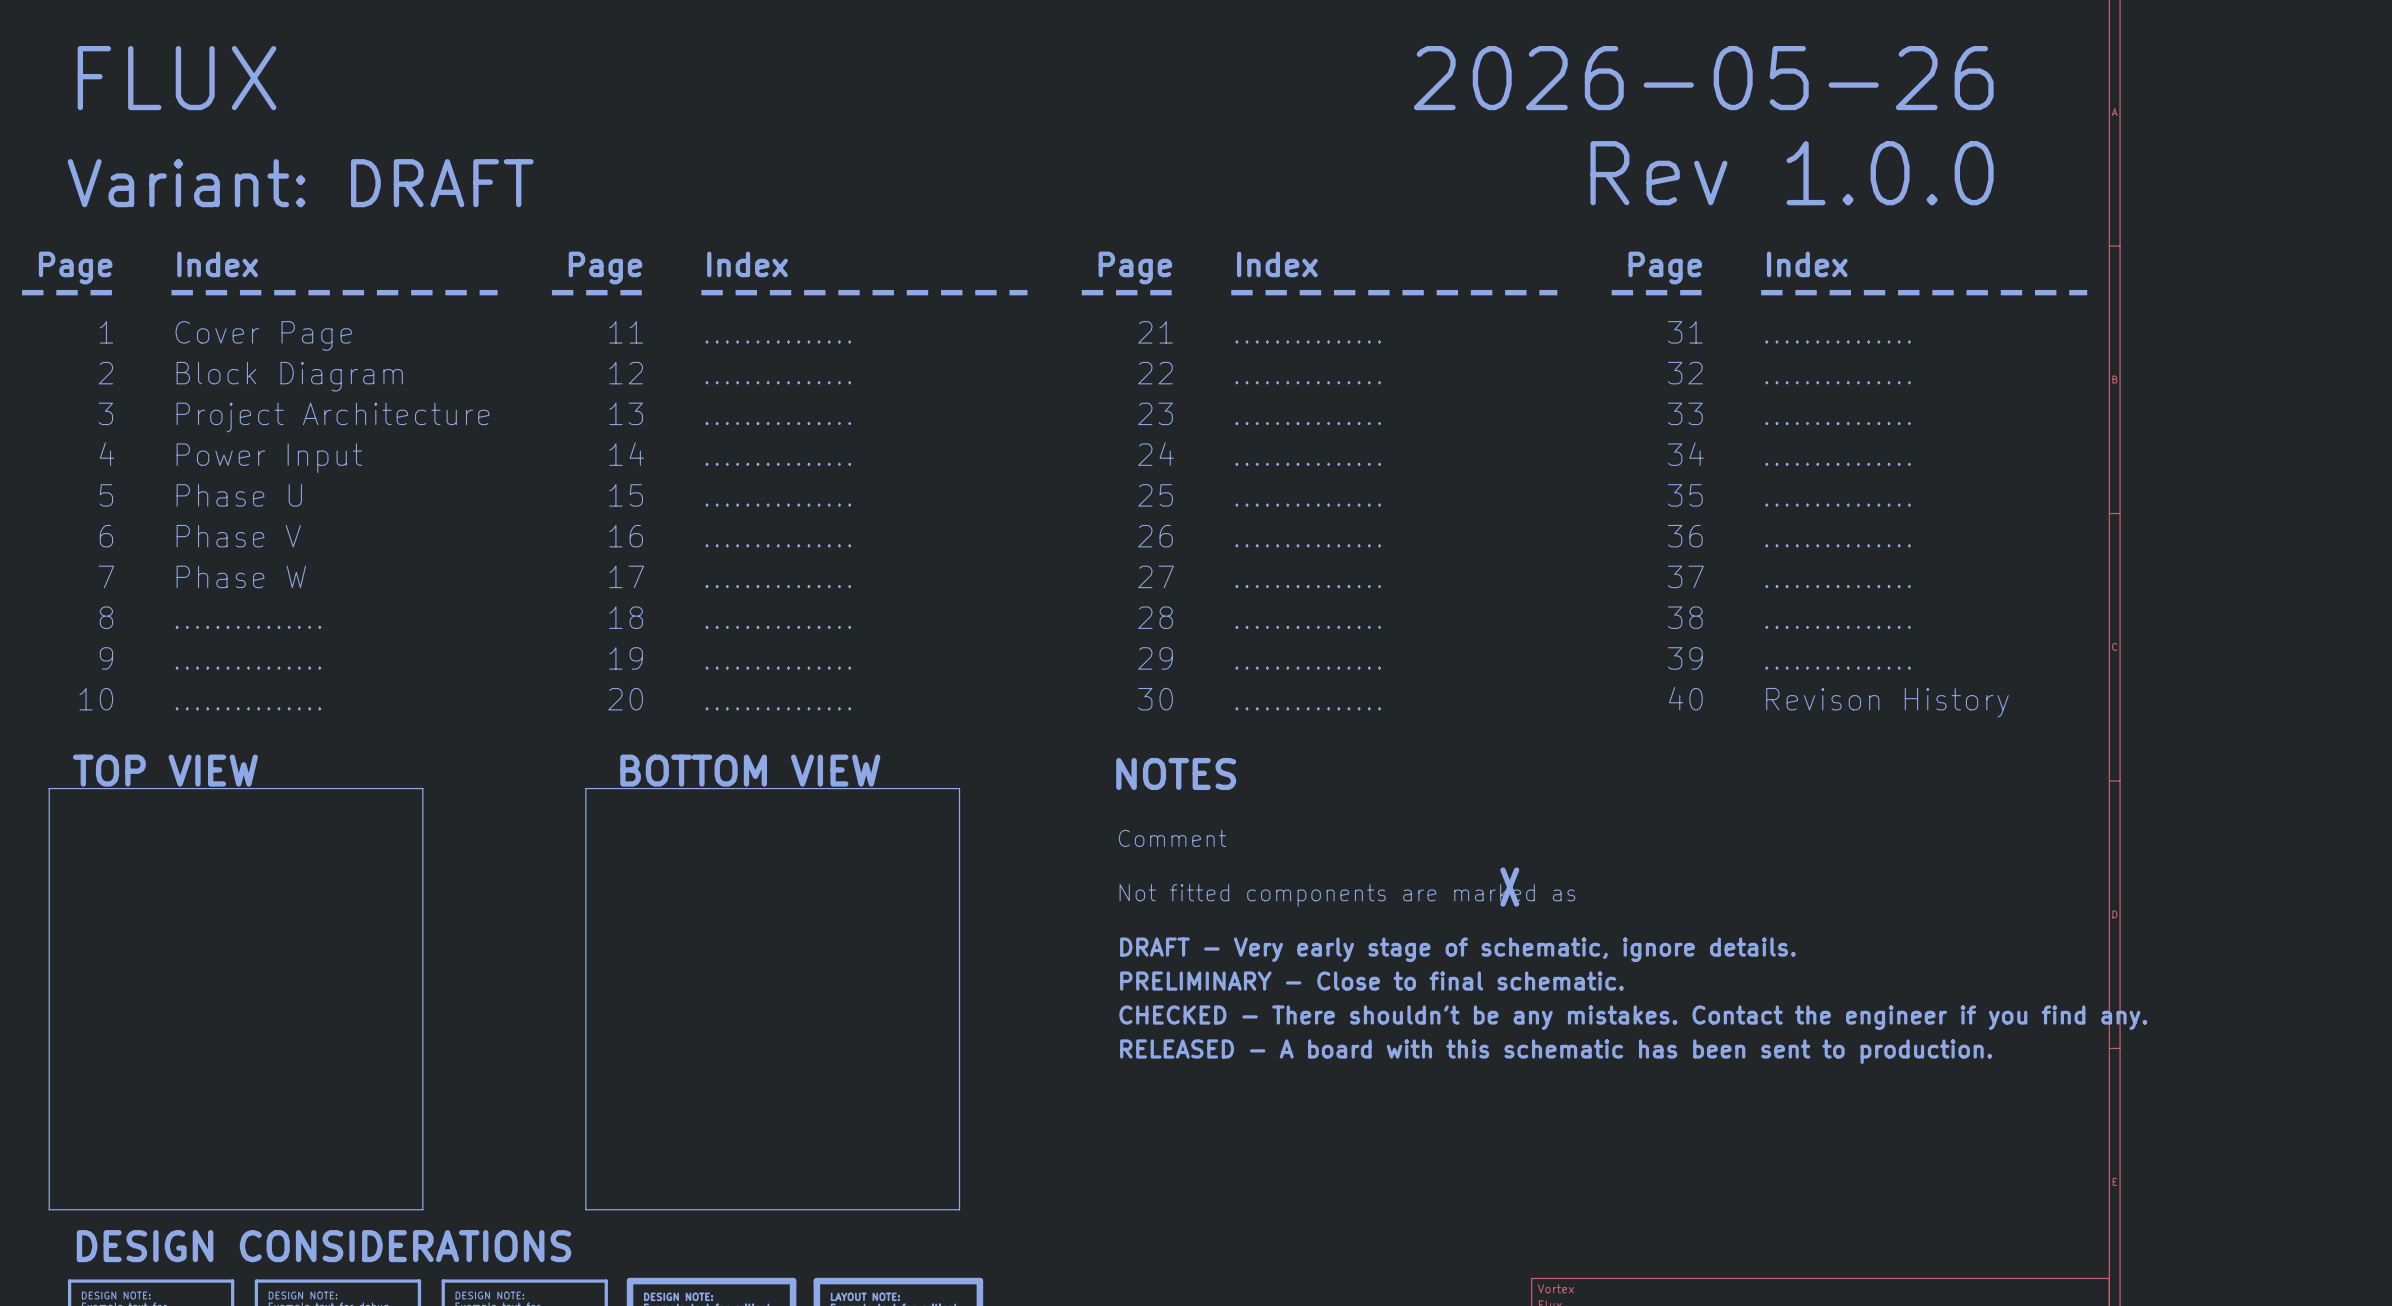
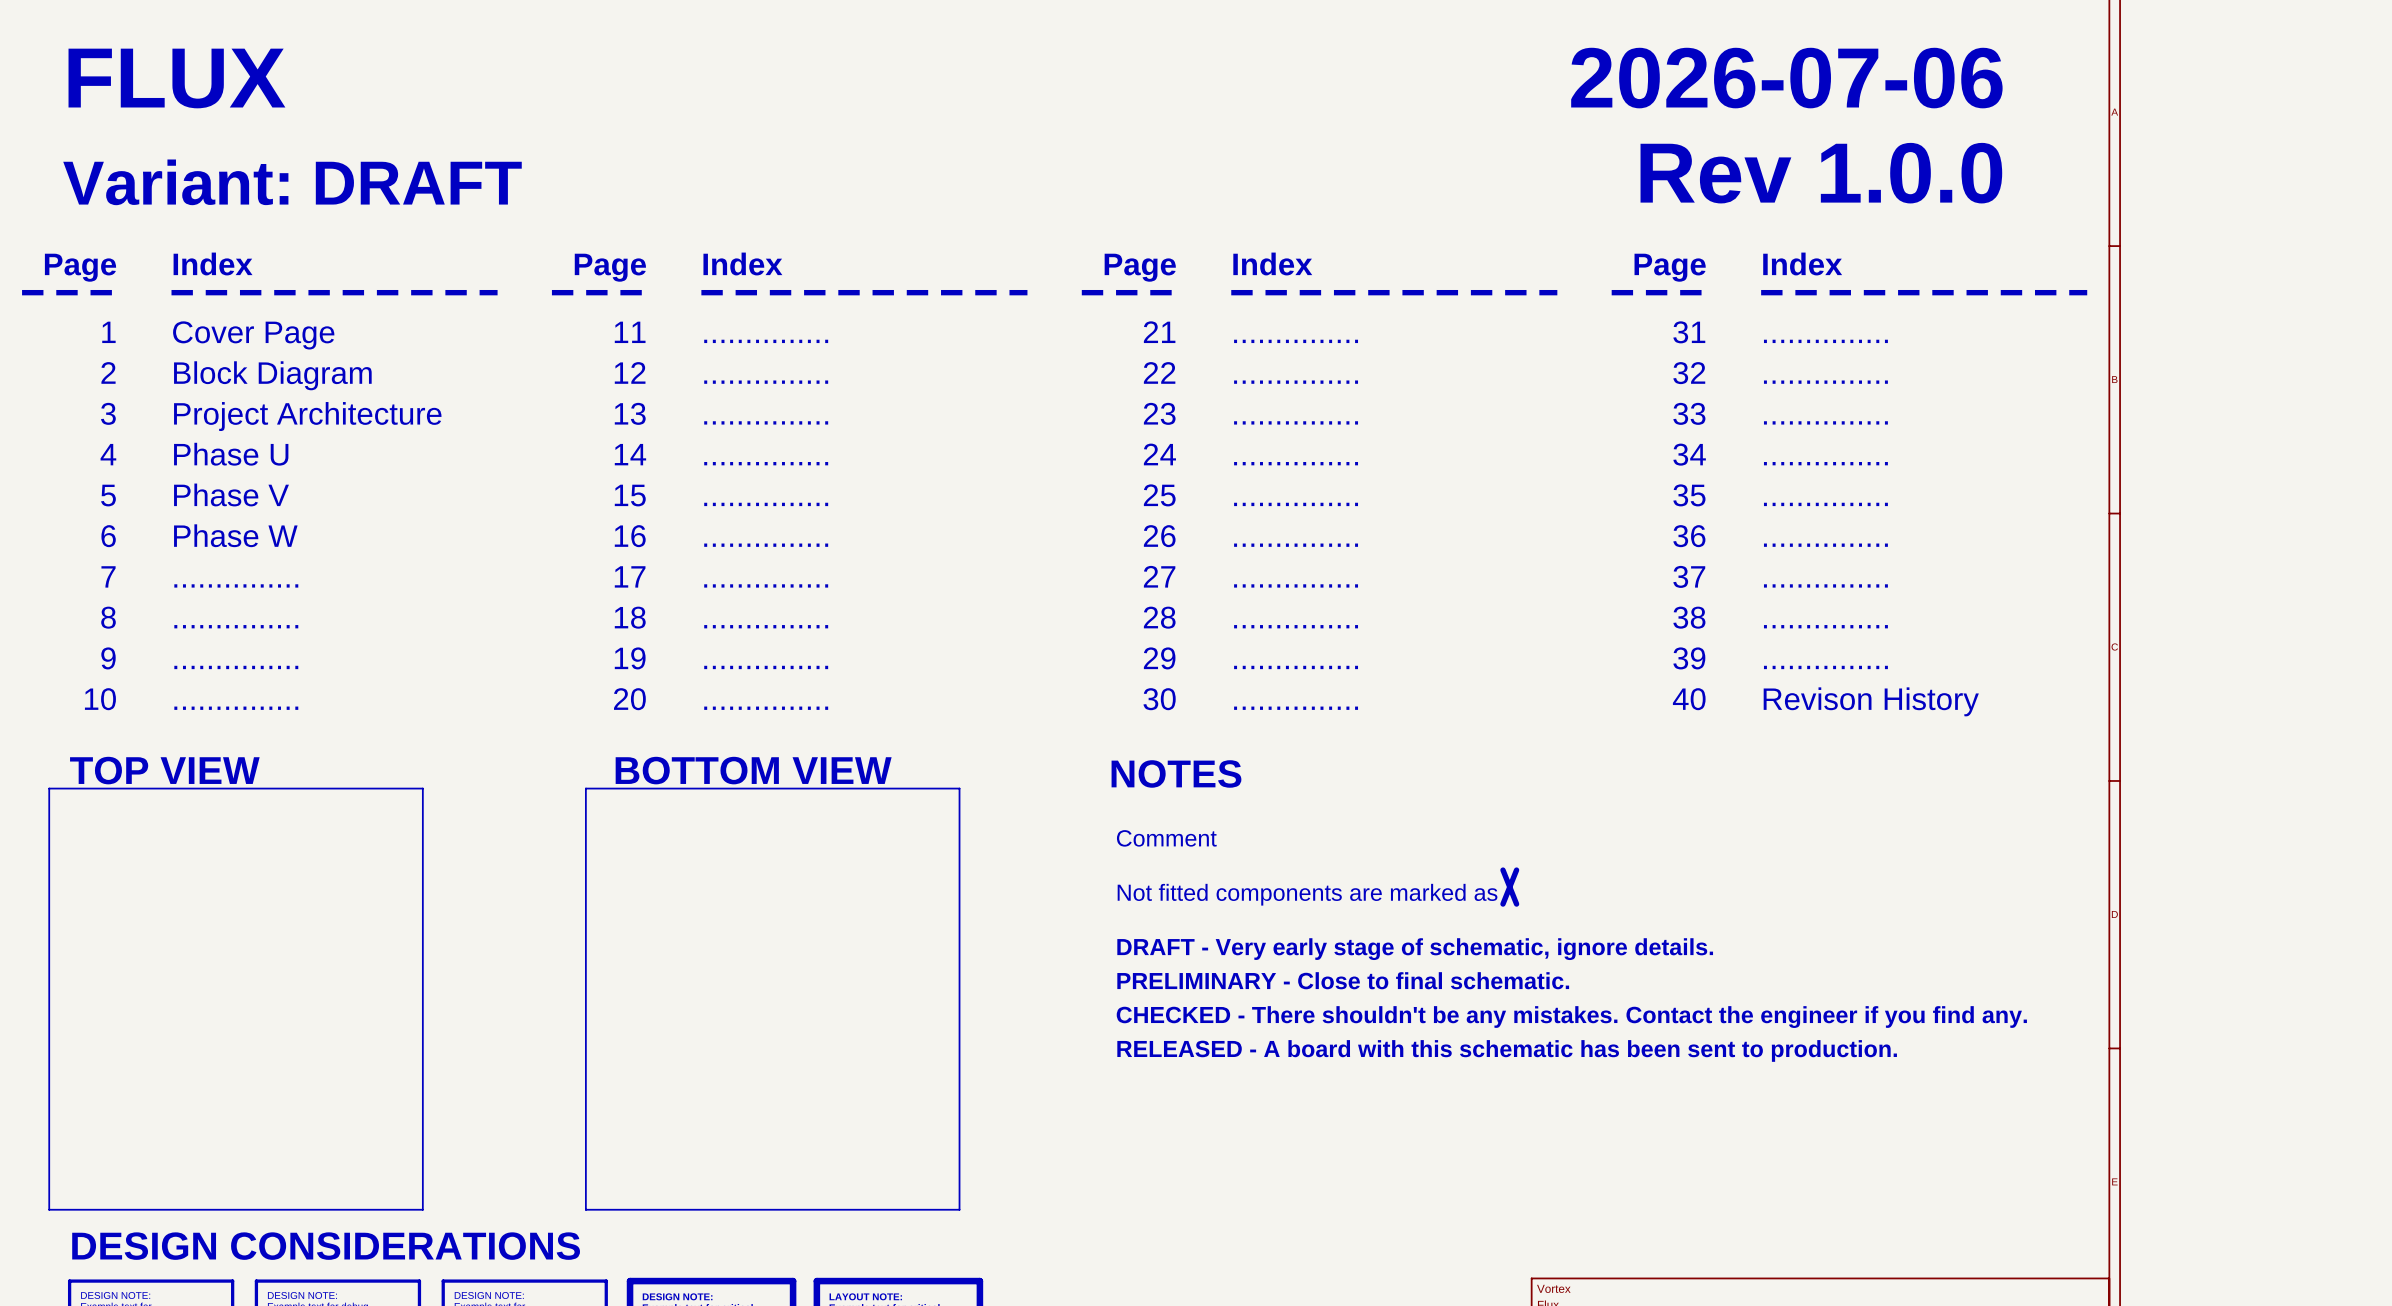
text: 2026-05-26 (1703, 78) -> 2026-07-06 (1786, 78)
text: Power Input (269, 458) -> Phase U (231, 454)
text: Phase U (239, 495) -> Phase V (231, 494)
text: Phase V (238, 536) -> Phase W (235, 535)
text: Phase W (241, 576) -> ............... (236, 585)

